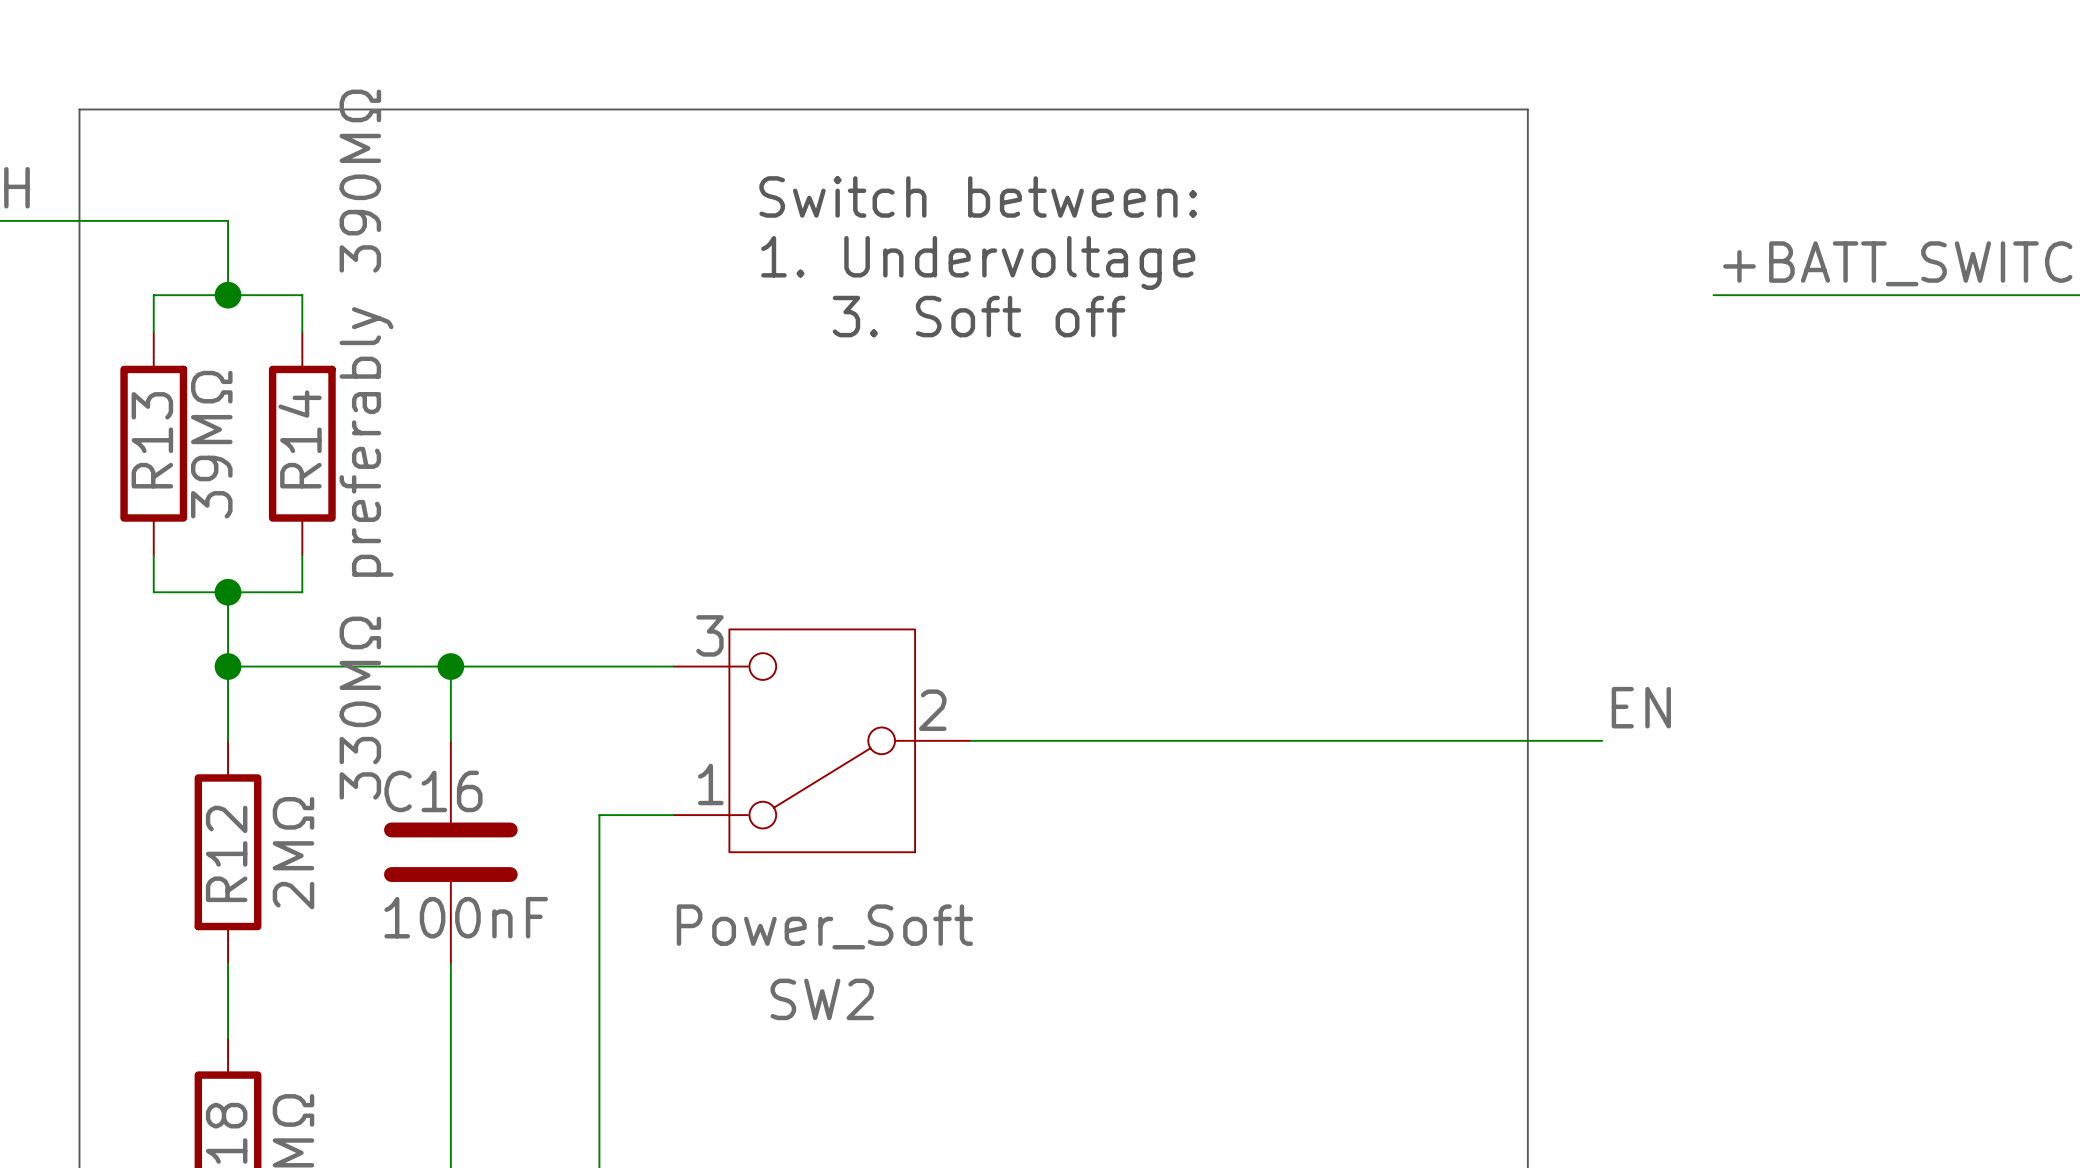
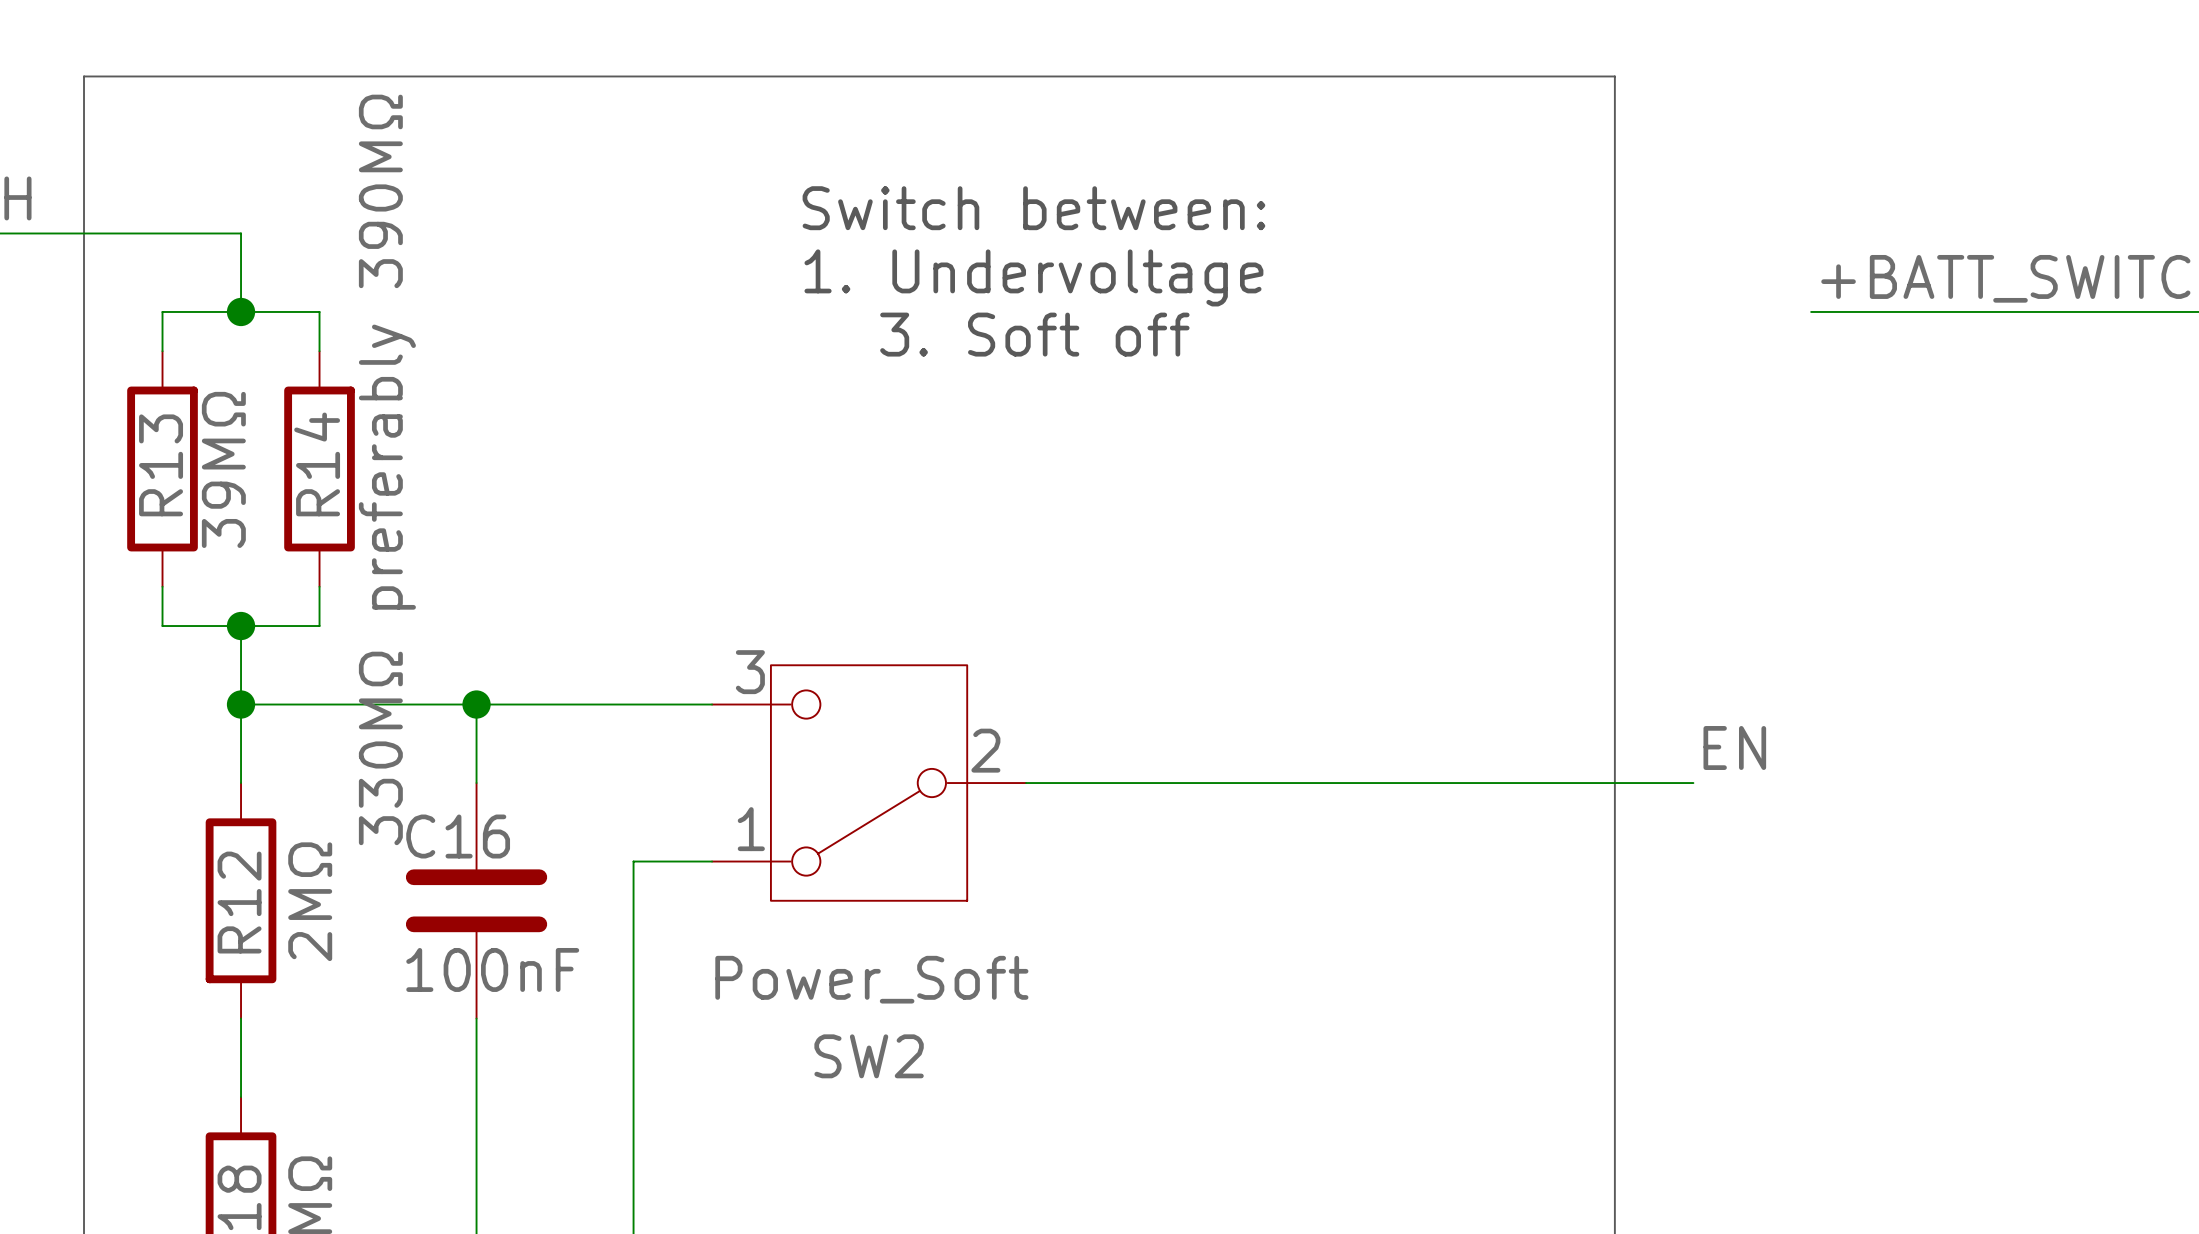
line: (79, 109) (1527, 109) -> (84, 115) (84, 76) (1614, 76) (1614, 115)

